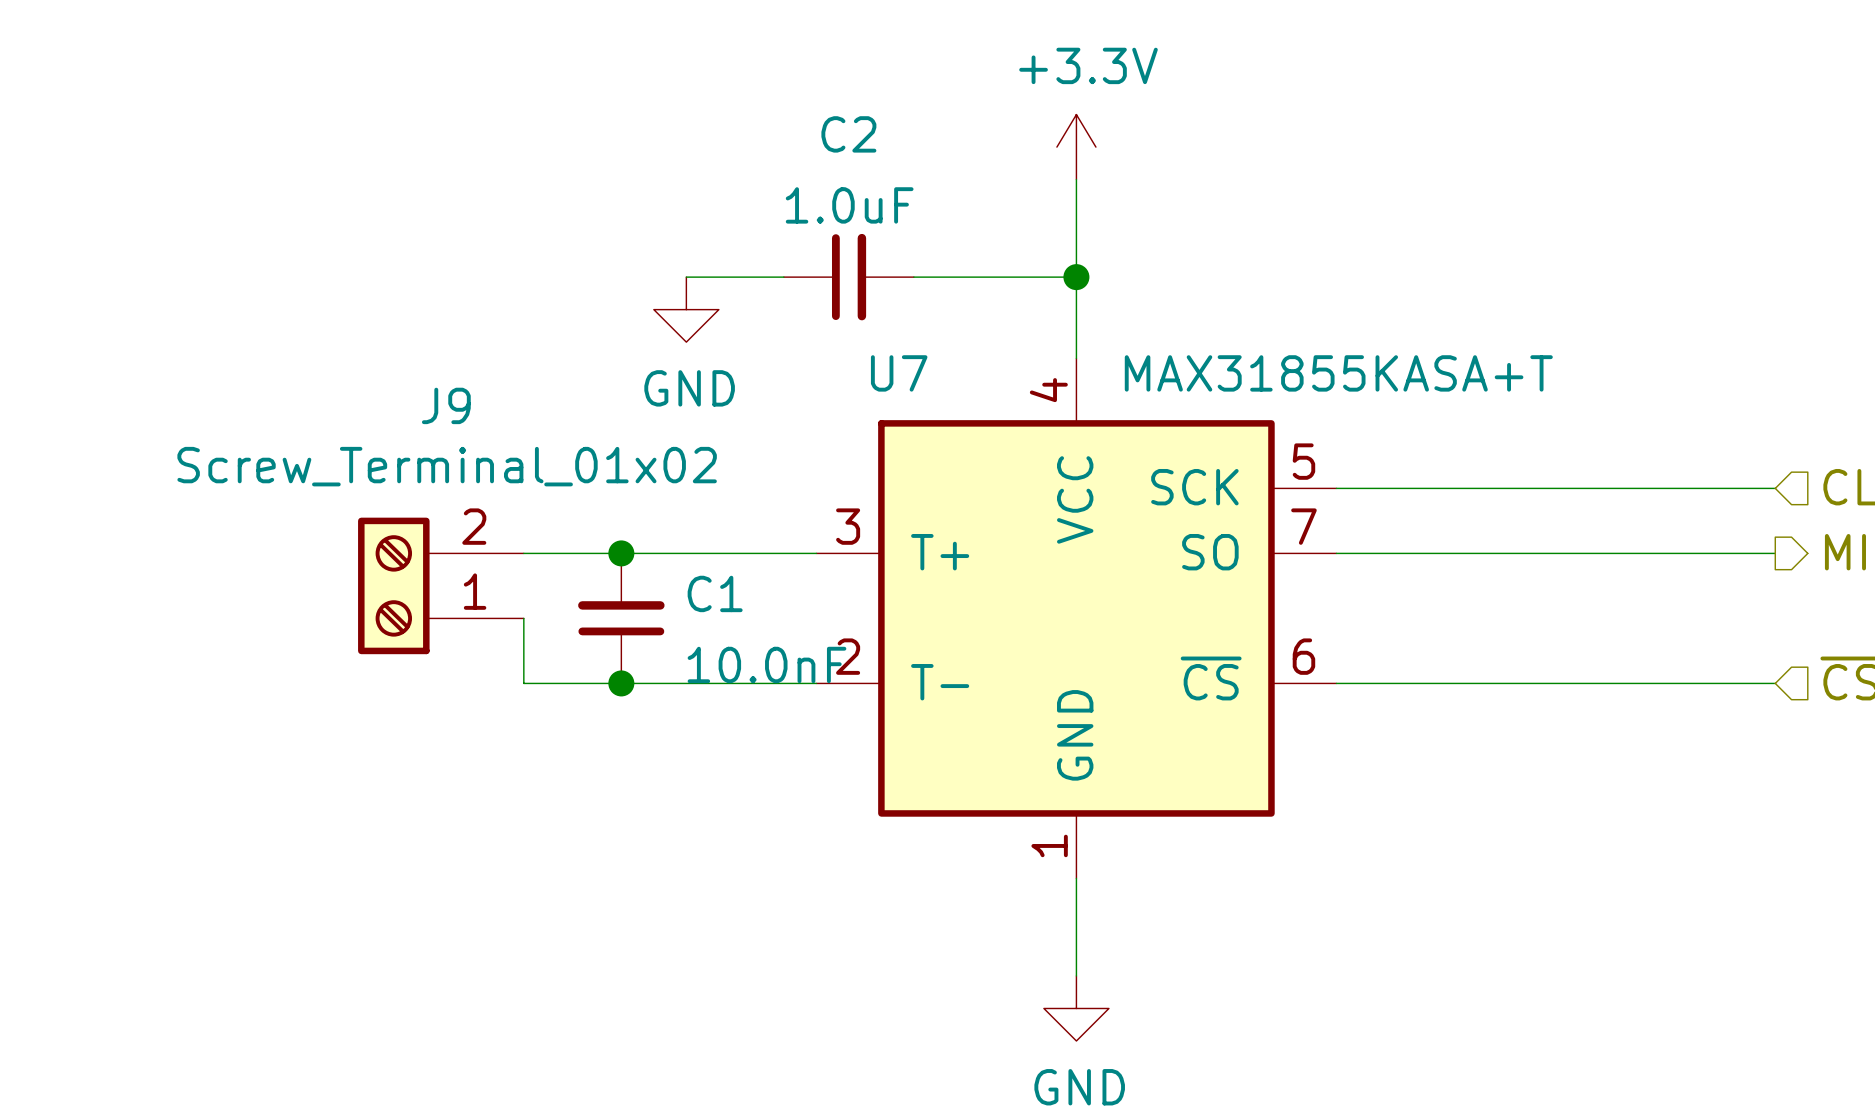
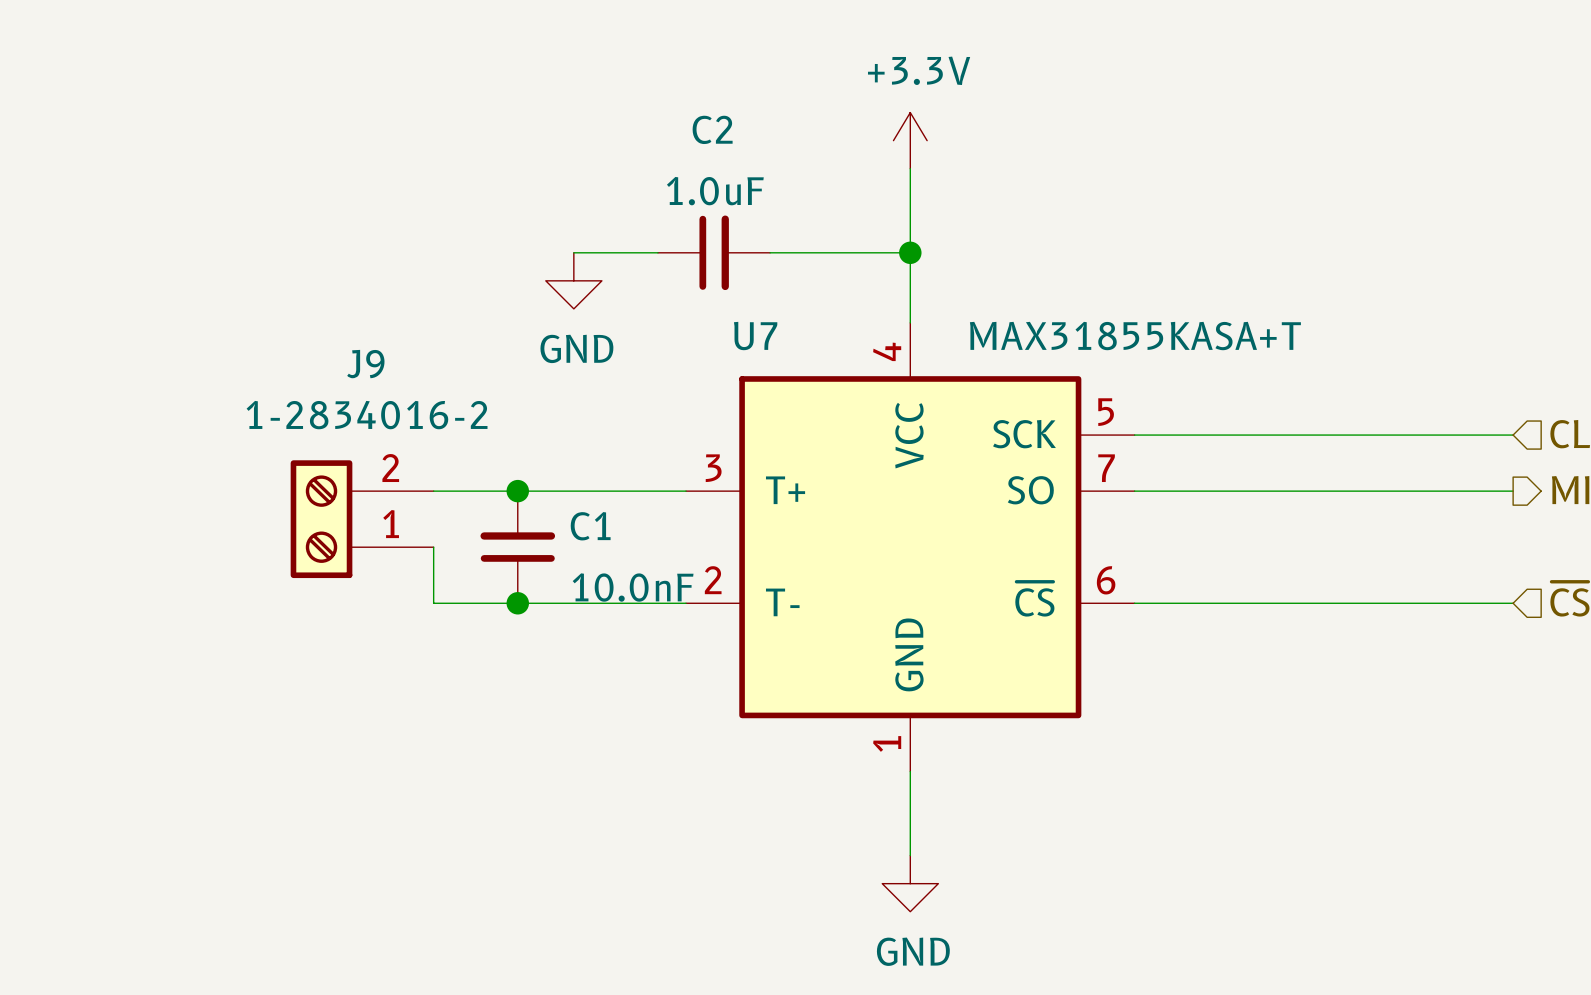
J9 value: Screw_Terminal_01x02 (447, 466) -> 1-2834016-2 (367, 415)

